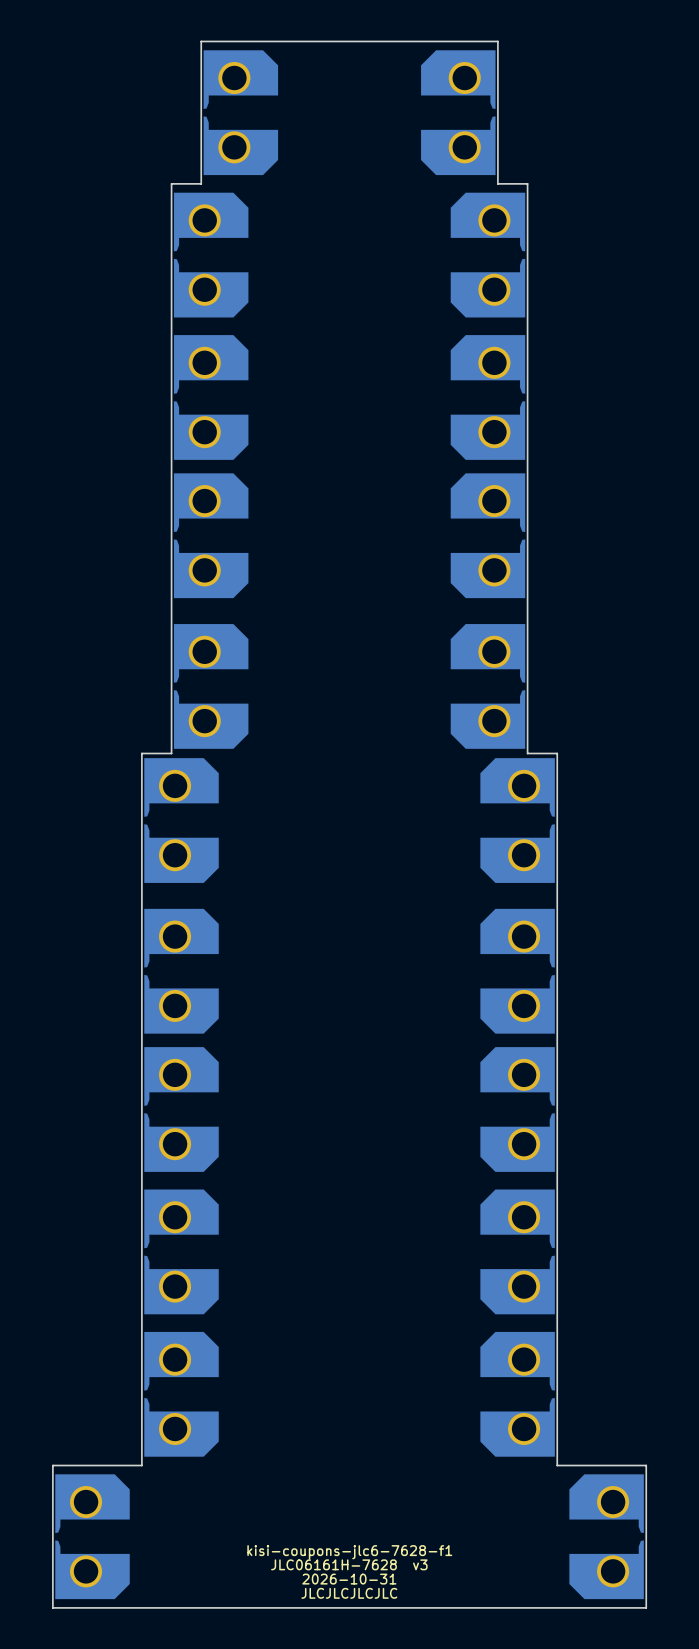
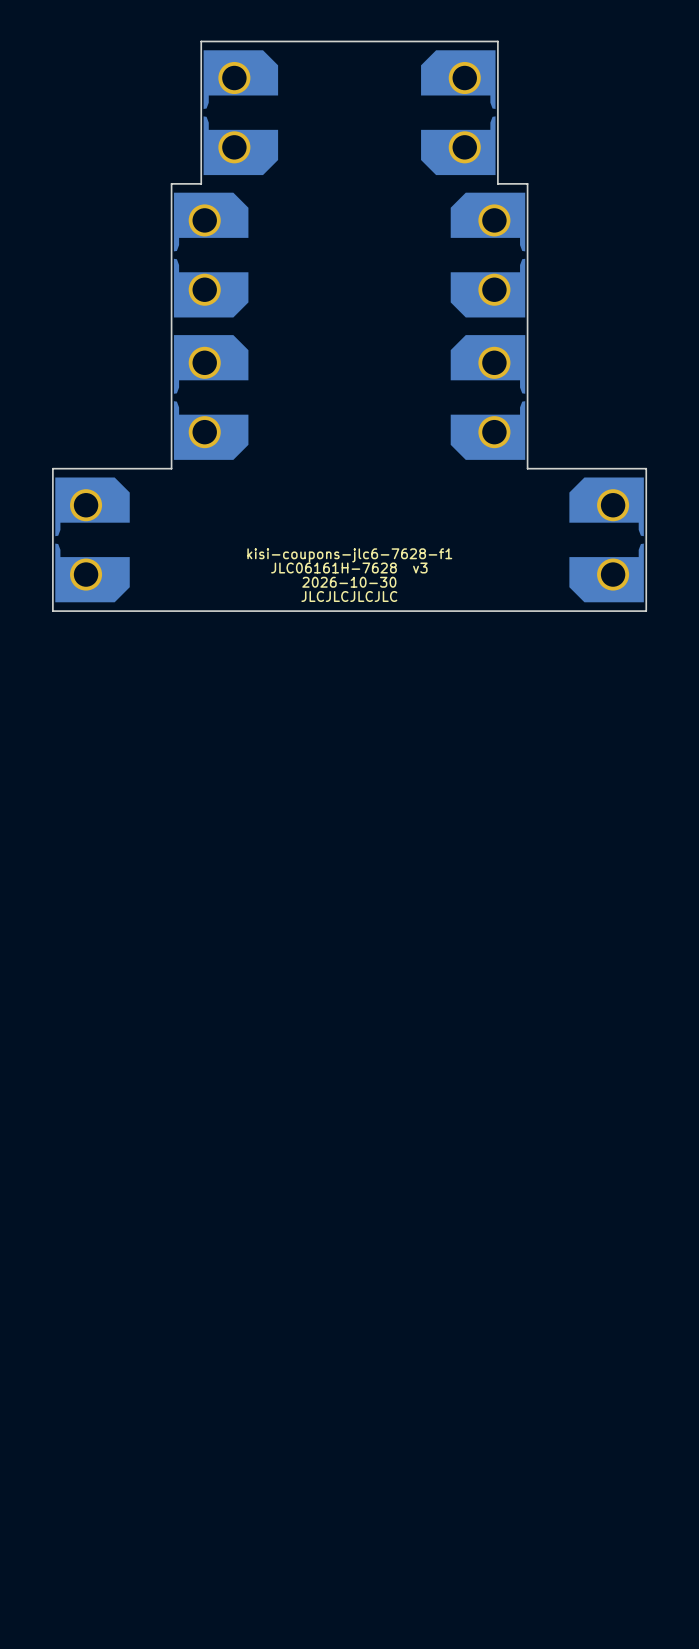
board edge: (527, 468) (527, 753) (557, 753) (557, 1465) (646, 1465) (646, 1607) (52, 1607) (52, 1465) (141, 1465) (141, 753) (171, 753) (171, 468) -> (527, 468) (646, 468) (646, 611) (52, 611) (52, 468) (171, 468)
part: (211, 535) -> none
part: (487, 535) -> none
part: none -> (92, 539)
part: none -> (606, 539)
text: none -> kisi-coupons-jlc6-7628-f1 (349, 555)
text: none -> JLC06161H-7628 v3 (349, 568)
text: none -> 2026-10-30 (349, 582)
text: none -> JLCJLCJLCJLC (349, 596)
part: (211, 686) -> none
part: (487, 686) -> none
part: (181, 820) -> none
part: (517, 820) -> none
part: (181, 971) -> none
part: (517, 971) -> none
part: (181, 1109) -> none
part: (517, 1109) -> none
part: (181, 1251) -> none
part: (517, 1251) -> none
part: (181, 1394) -> none
part: (517, 1394) -> none
part: (92, 1536) -> none
part: (606, 1536) -> none
text: kisi-coupons-jlc6-7628-f1 (349, 1552) -> none
text: JLC06161H-7628 v3 (349, 1564) -> none
text: 2026-10-31 (349, 1579) -> none
text: JLCJLCJLCJLC (349, 1593) -> none

